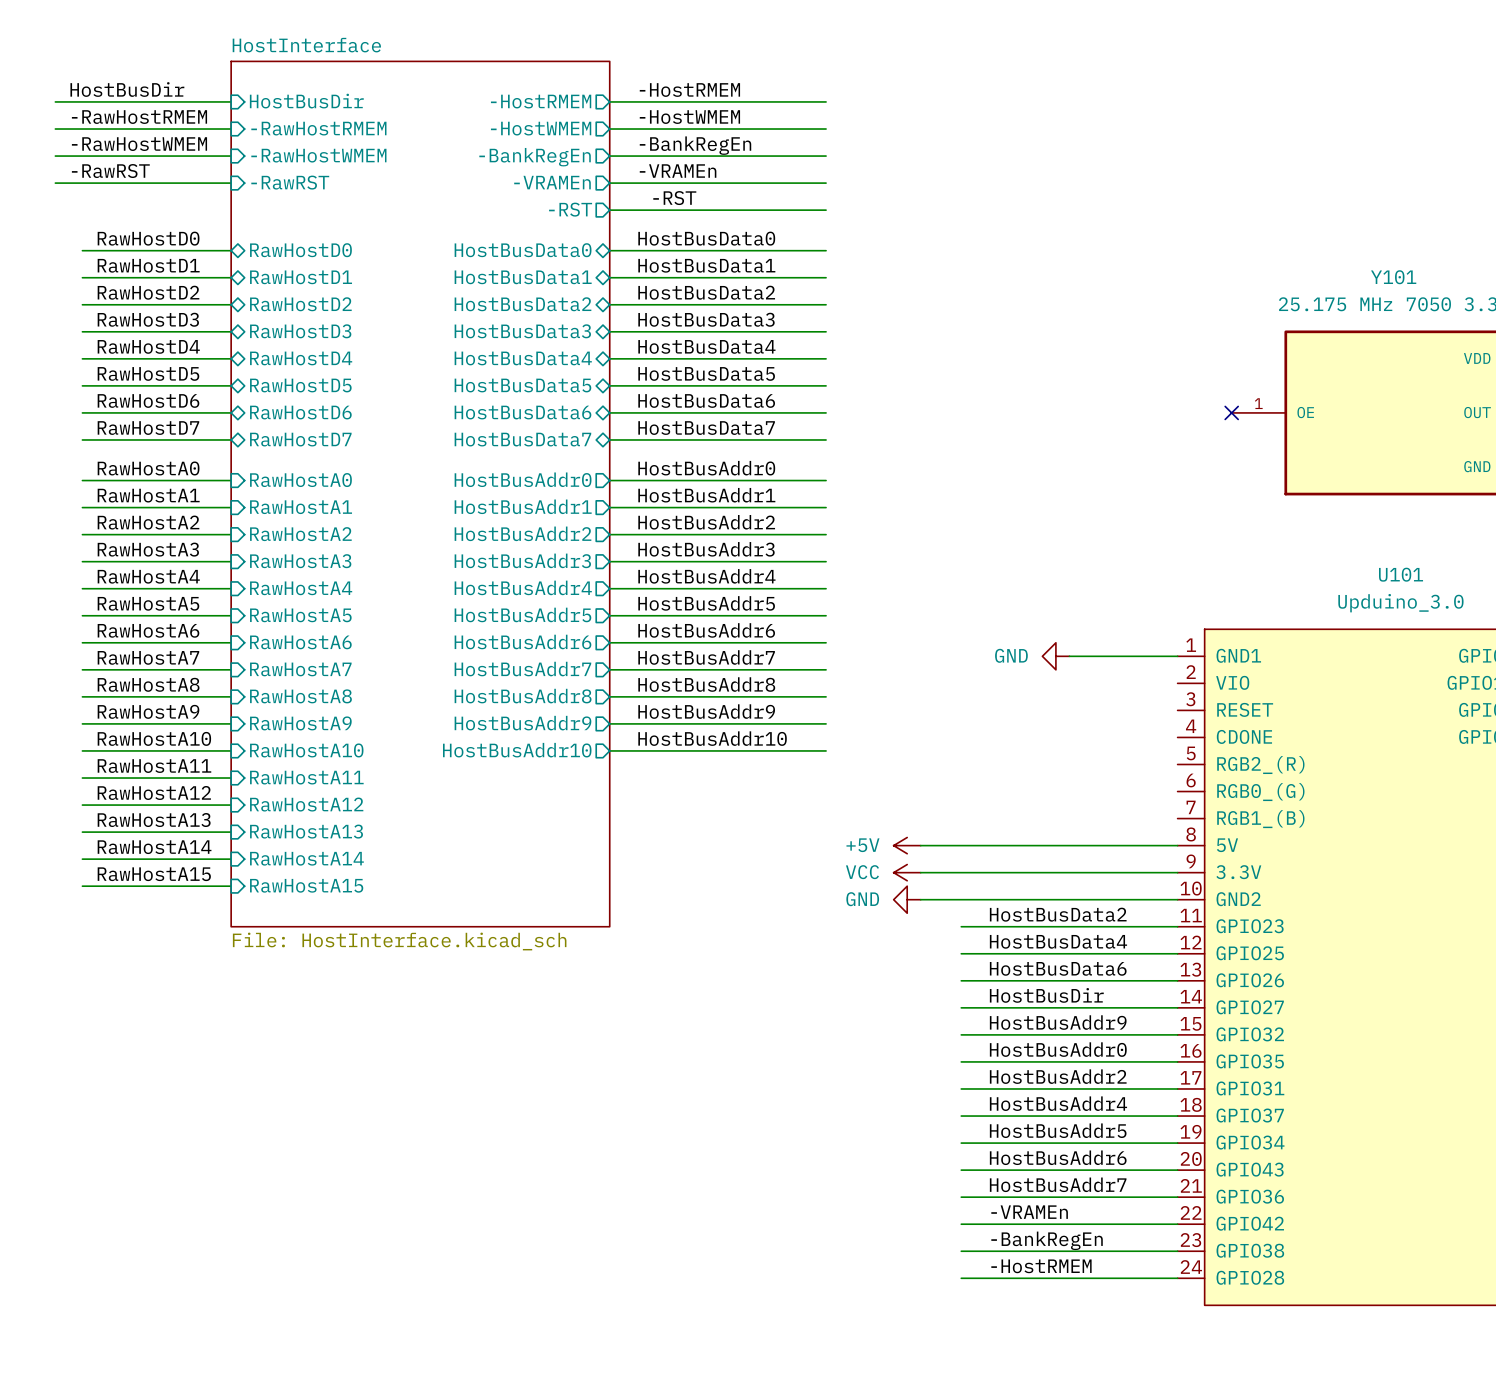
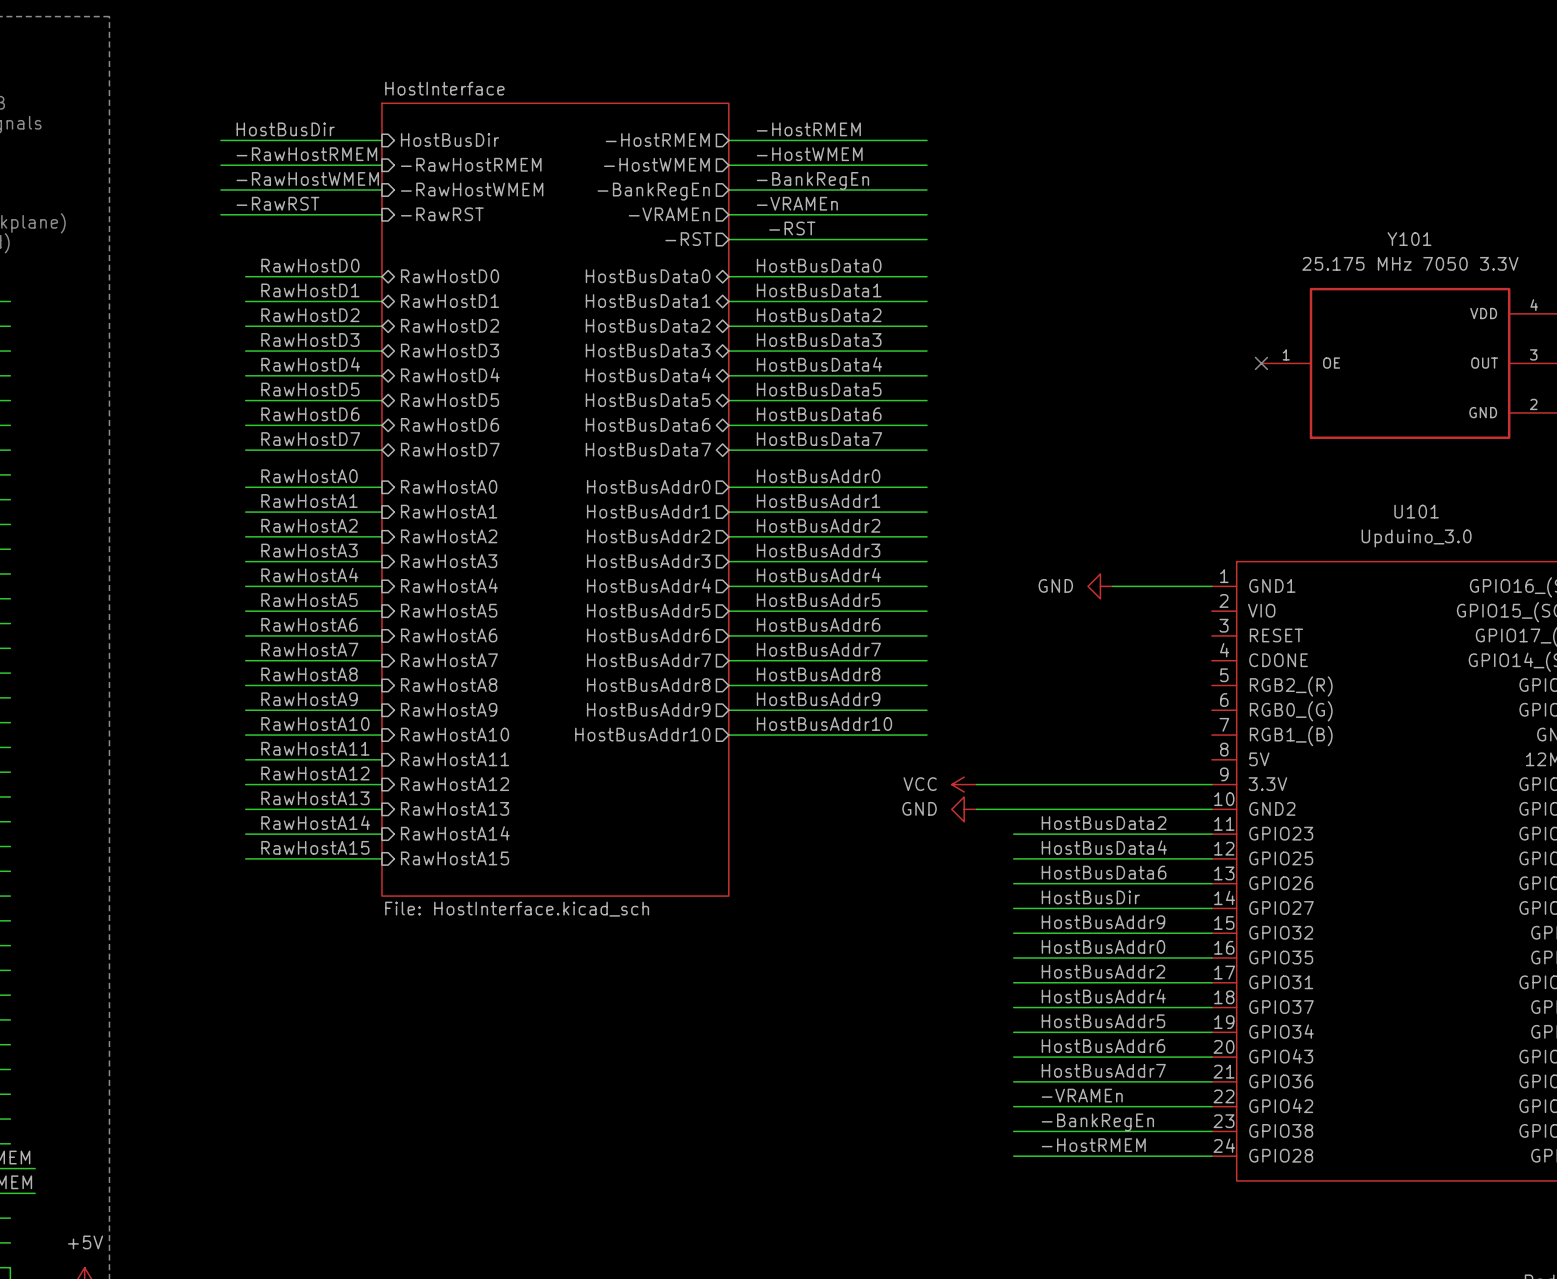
label position: HostBusDir (127, 89) -> HostBusDir (285, 129)
label position: -HostRMEM (689, 90) -> -HostRMEM (808, 129)
wire: (55, 101) (231, 101) -> none
sheet pin position: HostBusDir (306, 101) -> HostBusDir (450, 139)
sheet pin position: -HostRMEM (541, 101) -> -HostRMEM (657, 139)
wire: (609, 101) (826, 101) -> none
label position: -RawHostRMEM (139, 117) -> -RawHostRMEM (306, 154)
label position: -HostWMEM (689, 117) -> -HostWMEM (809, 154)
sheet pin position: -RawHostRMEM (318, 128) -> -RawHostRMEM (471, 164)
sheet pin position: -HostWMEM (541, 128) -> -HostWMEM (656, 164)
wire: (55, 129) (231, 129) -> (220, 190) (381, 190)
wire: (609, 129) (826, 129) -> none
label position: -RawHostWMEM (139, 144) -> -RawHostWMEM (307, 178)
label position: -BankRegEn (695, 145) -> -BankRegEn (812, 181)
sheet pin position: -RawHostWMEM (318, 155) -> -RawHostWMEM (472, 189)
wire: (55, 156) (231, 156) -> (220, 140) (381, 140)
wire: (609, 156) (826, 156) -> (728, 140) (927, 140)
sheet pin position: -BankRegEn (535, 157) -> -BankRegEn (653, 191)
label position: -RawRST (110, 171) -> -RawRST (277, 203)
label position: -VRAMEn (678, 171) -> -VRAMEn (797, 203)
sheet pin position: -RawRST (290, 182) -> -RawRST (442, 214)
sheet pin position: -VRAMEn (552, 182) -> -VRAMEn (669, 214)
wire: (55, 183) (231, 183) -> (220, 165) (381, 165)
wire: (609, 183) (826, 183) -> (728, 165) (927, 165)
label position: -RST (674, 198) -> -RST (792, 228)
sheet pin position: -RST (570, 209) -> -RST (688, 239)
wire: (609, 210) (826, 210) -> (728, 190) (927, 190)
label position: RawHostD0 (148, 238) -> RawHostD0 (310, 265)
label position: HostBusData0 (706, 238) -> HostBusData0 (819, 265)
wire: (82, 250) (95, 250) -> none
wire: none -> (344, 214) (381, 214)
sheet pin position: RawHostD0 (300, 250) -> RawHostD0 (450, 276)
sheet pin position: HostBusData0 (523, 250) -> HostBusData0 (648, 276)
wire: (609, 250) (650, 250) -> (889, 214) (927, 214)
label position: RawHostD1 (148, 265) -> RawHostD1 (310, 290)
label position: HostBusData1 (706, 265) -> HostBusData1 (819, 290)
wire: (82, 277) (231, 277) -> none
sheet pin position: RawHostD1 (301, 277) -> RawHostD1 (450, 301)
sheet pin position: HostBusData1 (523, 277) -> HostBusData1 (648, 301)
wire: (609, 277) (650, 277) -> (889, 239) (927, 239)
label position: RawHostD2 (148, 292) -> RawHostD2 (310, 315)
label position: HostBusData2 (706, 292) -> HostBusData2 (819, 315)
wire: (82, 304) (231, 304) -> (245, 276) (381, 276)
sheet pin position: RawHostD2 (300, 304) -> RawHostD2 (450, 325)
sheet pin position: HostBusData2 (522, 304) -> HostBusData2 (648, 325)
wire: (609, 304) (826, 304) -> (728, 276) (927, 276)
label position: RawHostD3 (148, 319) -> RawHostD3 (310, 339)
label position: HostBusData3 (706, 319) -> HostBusData3 (819, 339)
wire: (82, 331) (231, 331) -> (245, 301) (381, 301)
sheet pin position: RawHostD3 (300, 331) -> RawHostD3 (450, 350)
sheet pin position: HostBusData3 (522, 331) -> HostBusData3 (648, 350)
wire: (609, 331) (826, 331) -> (728, 301) (927, 301)
label position: RawHostD4 (148, 346) -> RawHostD4 (310, 364)
label position: HostBusData4 (706, 346) -> HostBusData4 (819, 364)
wire: (82, 358) (231, 358) -> (245, 326) (381, 326)
sheet pin position: RawHostD4 (301, 358) -> RawHostD4 (450, 375)
sheet pin position: HostBusData4 (523, 358) -> HostBusData4 (648, 375)
wire: (609, 358) (826, 358) -> (728, 326) (927, 326)
label position: RawHostD5 (148, 373) -> RawHostD5 (310, 389)
label position: HostBusData5 (706, 373) -> HostBusData5 (819, 389)
wire: (82, 385) (231, 385) -> (245, 351) (381, 351)
sheet pin position: RawHostD5 (300, 385) -> RawHostD5 (450, 400)
sheet pin position: HostBusData5 (522, 385) -> HostBusData5 (648, 400)
wire: (609, 385) (826, 385) -> (728, 351) (927, 351)
label position: RawHostD6 (148, 400) -> RawHostD6 (310, 414)
label position: HostBusData6 (706, 400) -> HostBusData6 (819, 414)
wire: (82, 412) (231, 412) -> (245, 375) (381, 375)
sheet pin position: RawHostD6 (300, 412) -> RawHostD6 (450, 424)
sheet pin position: HostBusData6 (522, 412) -> HostBusData6 (648, 424)
wire: (609, 412) (826, 412) -> (728, 375) (927, 375)
label position: RawHostD7 (148, 428) -> RawHostD7 (310, 439)
label position: HostBusData7 (706, 428) -> HostBusData7 (819, 439)
wire: (82, 439) (231, 439) -> (245, 400) (381, 400)
sheet pin position: RawHostD7 (300, 439) -> RawHostD7 (450, 449)
sheet pin position: HostBusData7 (522, 439) -> HostBusData7 (648, 449)
wire: (609, 439) (826, 439) -> (728, 400) (927, 400)
label position: RawHostA0 (148, 468) -> RawHostA0 (309, 476)
label position: HostBusAddr0 (706, 468) -> HostBusAddr0 (818, 476)
sheet pin position: HostBusAddr0 (523, 479) -> HostBusAddr0 (648, 486)
wire: (82, 480) (122, 480) -> (344, 425) (381, 425)
sheet pin position: RawHostA0 (300, 480) -> RawHostA0 (449, 486)
wire: (609, 480) (650, 480) -> (889, 425) (927, 425)
sheet HostInterface position: (420, 494) -> (555, 499)
label position: RawHostA1 (148, 495) -> RawHostA1 (309, 501)
label position: HostBusAddr1 (706, 495) -> HostBusAddr1 (818, 501)
sheet pin position: HostBusAddr1 (523, 506) -> HostBusAddr1 (648, 511)
wire: (82, 507) (122, 507) -> (344, 450) (381, 450)
sheet pin position: RawHostA1 (301, 507) -> RawHostA1 (449, 511)
wire: (609, 507) (650, 507) -> (889, 450) (927, 450)
label position: RawHostA2 (148, 522) -> RawHostA2 (309, 525)
label position: HostBusAddr2 (706, 522) -> HostBusAddr2 (818, 525)
sheet pin position: HostBusAddr2 (522, 533) -> HostBusAddr2 (648, 536)
wire: (82, 534) (231, 534) -> (245, 487) (381, 487)
sheet pin position: RawHostA2 (300, 534) -> RawHostA2 (449, 536)
wire: (609, 534) (826, 534) -> (728, 487) (927, 487)
label position: RawHostA3 (148, 549) -> RawHostA3 (309, 550)
label position: HostBusAddr3 (706, 549) -> HostBusAddr3 (818, 550)
sheet pin position: HostBusAddr3 (522, 560) -> HostBusAddr3 (648, 561)
wire: (82, 561) (231, 561) -> (245, 512) (381, 512)
sheet pin position: RawHostA3 (300, 561) -> RawHostA3 (449, 561)
wire: (609, 561) (826, 561) -> (728, 512) (927, 512)
label position: RawHostA4 (148, 576) -> RawHostA4 (309, 575)
label position: HostBusAddr4 (706, 576) -> HostBusAddr4 (818, 575)
sheet pin position: HostBusAddr4 (523, 587) -> HostBusAddr4 (648, 585)
wire: (82, 588) (231, 588) -> (245, 536) (381, 536)
sheet pin position: RawHostA4 (301, 588) -> RawHostA4 (449, 585)
wire: (609, 588) (826, 588) -> (728, 536) (927, 536)
label position: RawHostA5 (148, 603) -> RawHostA5 (309, 600)
label position: HostBusAddr5 (706, 603) -> HostBusAddr5 (818, 600)
sheet pin position: HostBusAddr5 (522, 614) -> HostBusAddr5 (648, 610)
wire: (82, 615) (231, 615) -> (245, 561) (381, 561)
sheet pin position: RawHostA5 (300, 615) -> RawHostA5 (449, 610)
wire: (609, 615) (826, 615) -> (728, 561) (927, 561)
label position: RawHostA6 (148, 630) -> RawHostA6 (309, 624)
label position: HostBusAddr6 (706, 630) -> HostBusAddr6 (818, 624)
wire: (82, 642) (231, 642) -> (245, 586) (381, 586)
sheet pin position: RawHostA6 (300, 642) -> RawHostA6 (449, 635)
sheet pin position: HostBusAddr6 (522, 642) -> HostBusAddr6 (648, 635)
wire: (609, 642) (826, 642) -> (728, 586) (927, 586)
label position: RawHostA7 (148, 657) -> RawHostA7 (309, 649)
label position: HostBusAddr7 (706, 657) -> HostBusAddr7 (818, 649)
wire: (82, 669) (231, 669) -> (245, 611) (381, 611)
sheet pin position: RawHostA7 (300, 669) -> RawHostA7 (449, 660)
sheet pin position: HostBusAddr7 (522, 669) -> HostBusAddr7 (648, 660)
wire: (609, 669) (826, 669) -> (728, 611) (927, 611)
label position: RawHostA8 (148, 684) -> RawHostA8 (309, 674)
label position: HostBusAddr8 (706, 684) -> HostBusAddr8 (818, 674)
wire: (82, 696) (231, 696) -> (245, 635) (381, 635)
sheet pin position: RawHostA8 (300, 696) -> RawHostA8 (449, 685)
sheet pin position: HostBusAddr8 (523, 696) -> HostBusAddr8 (648, 685)
wire: (609, 696) (826, 696) -> (728, 635) (927, 635)
label position: RawHostA9 (148, 711) -> RawHostA9 (309, 699)
label position: HostBusAddr9 (706, 711) -> HostBusAddr9 (818, 699)
wire: (82, 723) (231, 723) -> (245, 660) (381, 660)
sheet pin position: RawHostA9 (300, 723) -> RawHostA9 (449, 709)
sheet pin position: HostBusAddr9 (522, 723) -> HostBusAddr9 (648, 709)
wire: (609, 723) (826, 723) -> (728, 660) (927, 660)
label position: RawHostA10 (154, 738) -> RawHostA10 (315, 723)
label position: HostBusAddr10 (712, 738) -> HostBusAddr10 (824, 723)
wire: (82, 750) (231, 750) -> (245, 685) (381, 685)
sheet pin position: RawHostA10 (306, 750) -> RawHostA10 (455, 734)
sheet pin position: HostBusAddr10 (517, 750) -> HostBusAddr10 (642, 734)
wire: (609, 750) (826, 750) -> (728, 685) (927, 685)
label position: RawHostA11 (154, 766) -> RawHostA11 (315, 748)
sheet pin position: RawHostA11 (306, 777) -> RawHostA11 (455, 759)
wire: (82, 778) (231, 778) -> (245, 710) (381, 710)
wire: none -> (728, 710) (927, 710)
label position: RawHostA12 (154, 792) -> RawHostA12 (315, 773)
sheet pin position: RawHostA12 (306, 804) -> RawHostA12 (455, 784)
wire: (82, 805) (231, 805) -> (245, 735) (381, 735)
wire: none -> (728, 735) (927, 735)
label position: RawHostA13 (154, 820) -> RawHostA13 (315, 798)
sheet pin position: RawHostA13 (306, 831) -> RawHostA13 (455, 808)
wire: (82, 832) (231, 832) -> (245, 759) (381, 759)
power symbol: +5V (907, 845) -> none
wire: (920, 845) (1177, 845) -> none
label position: RawHostA14 (154, 847) -> RawHostA14 (315, 822)
sheet pin position: RawHostA14 (306, 858) -> RawHostA14 (455, 833)
wire: (82, 859) (231, 859) -> (245, 784) (381, 784)
label position: RawHostA15 (154, 874) -> RawHostA15 (315, 847)
sheet pin position: RawHostA15 (306, 885) -> RawHostA15 (455, 858)
wire: (82, 886) (231, 886) -> (245, 809) (381, 809)
wire: none -> (245, 834) (381, 834)
wire: none -> (245, 858) (381, 858)

